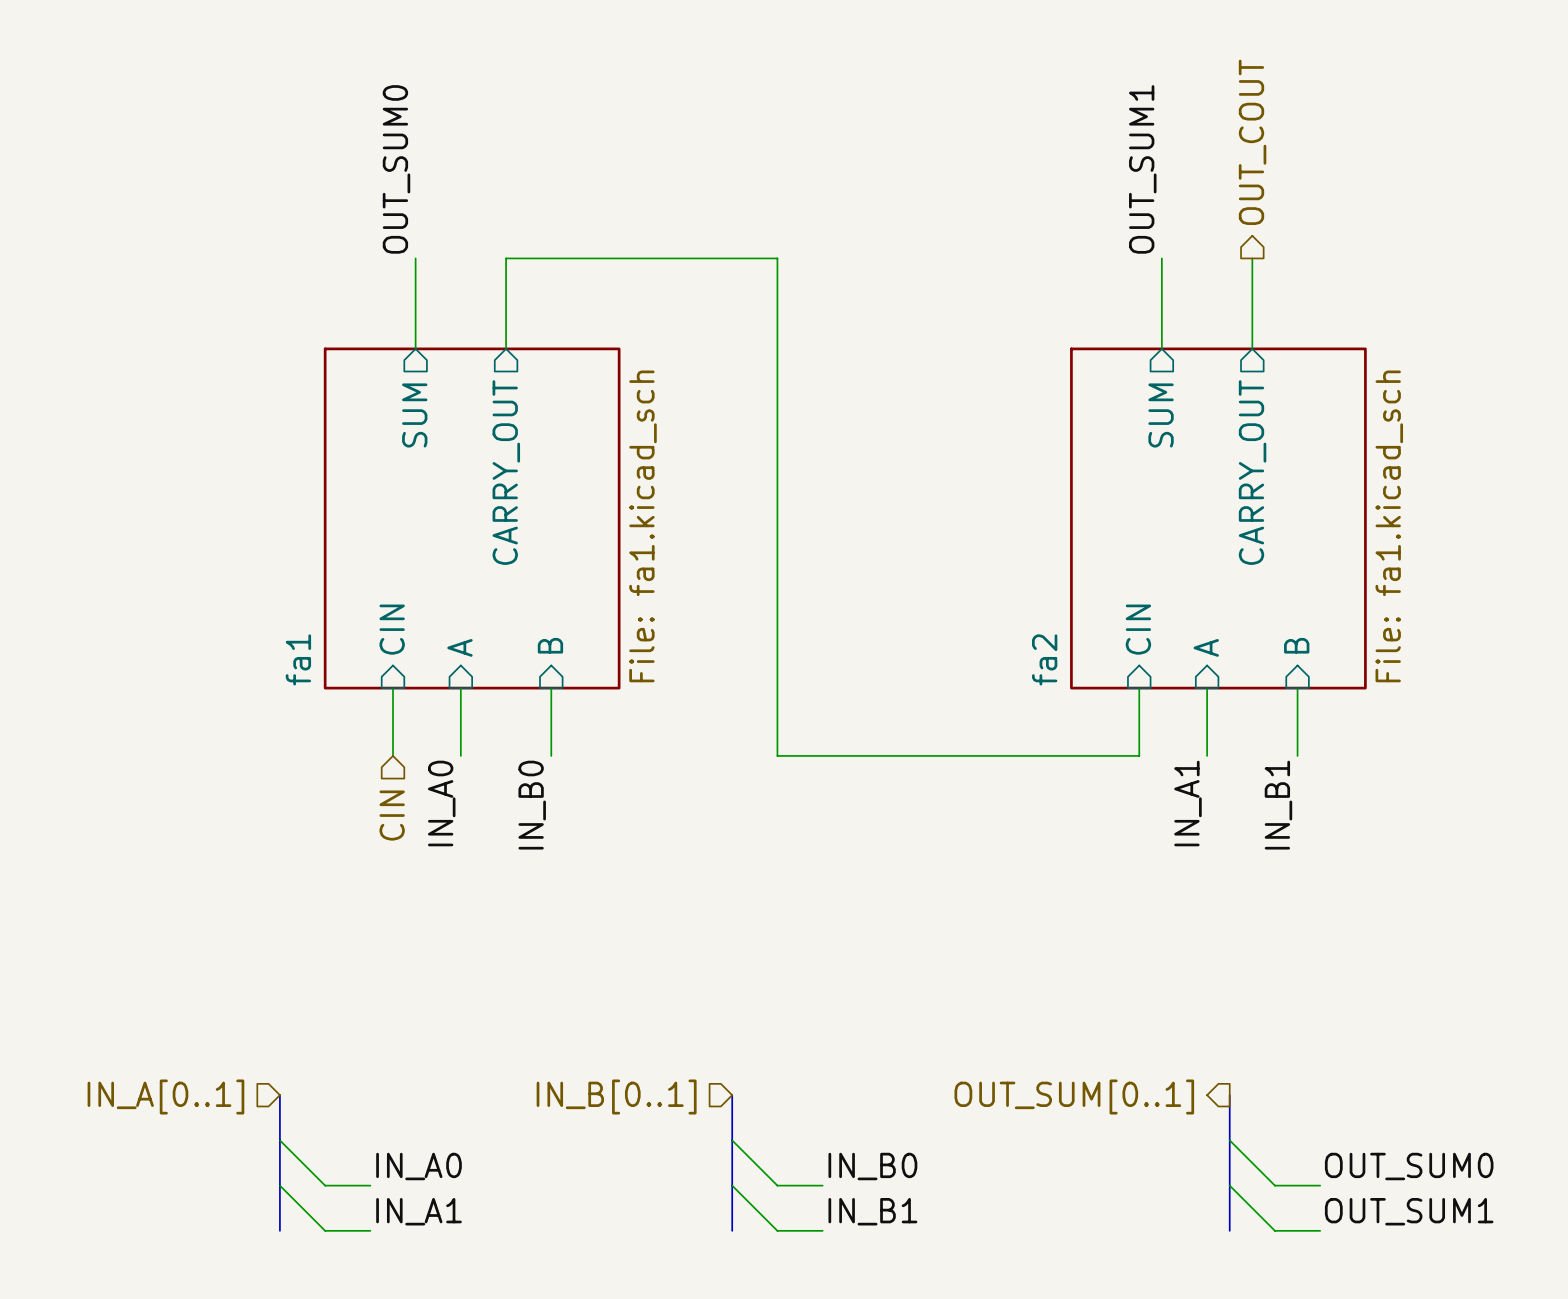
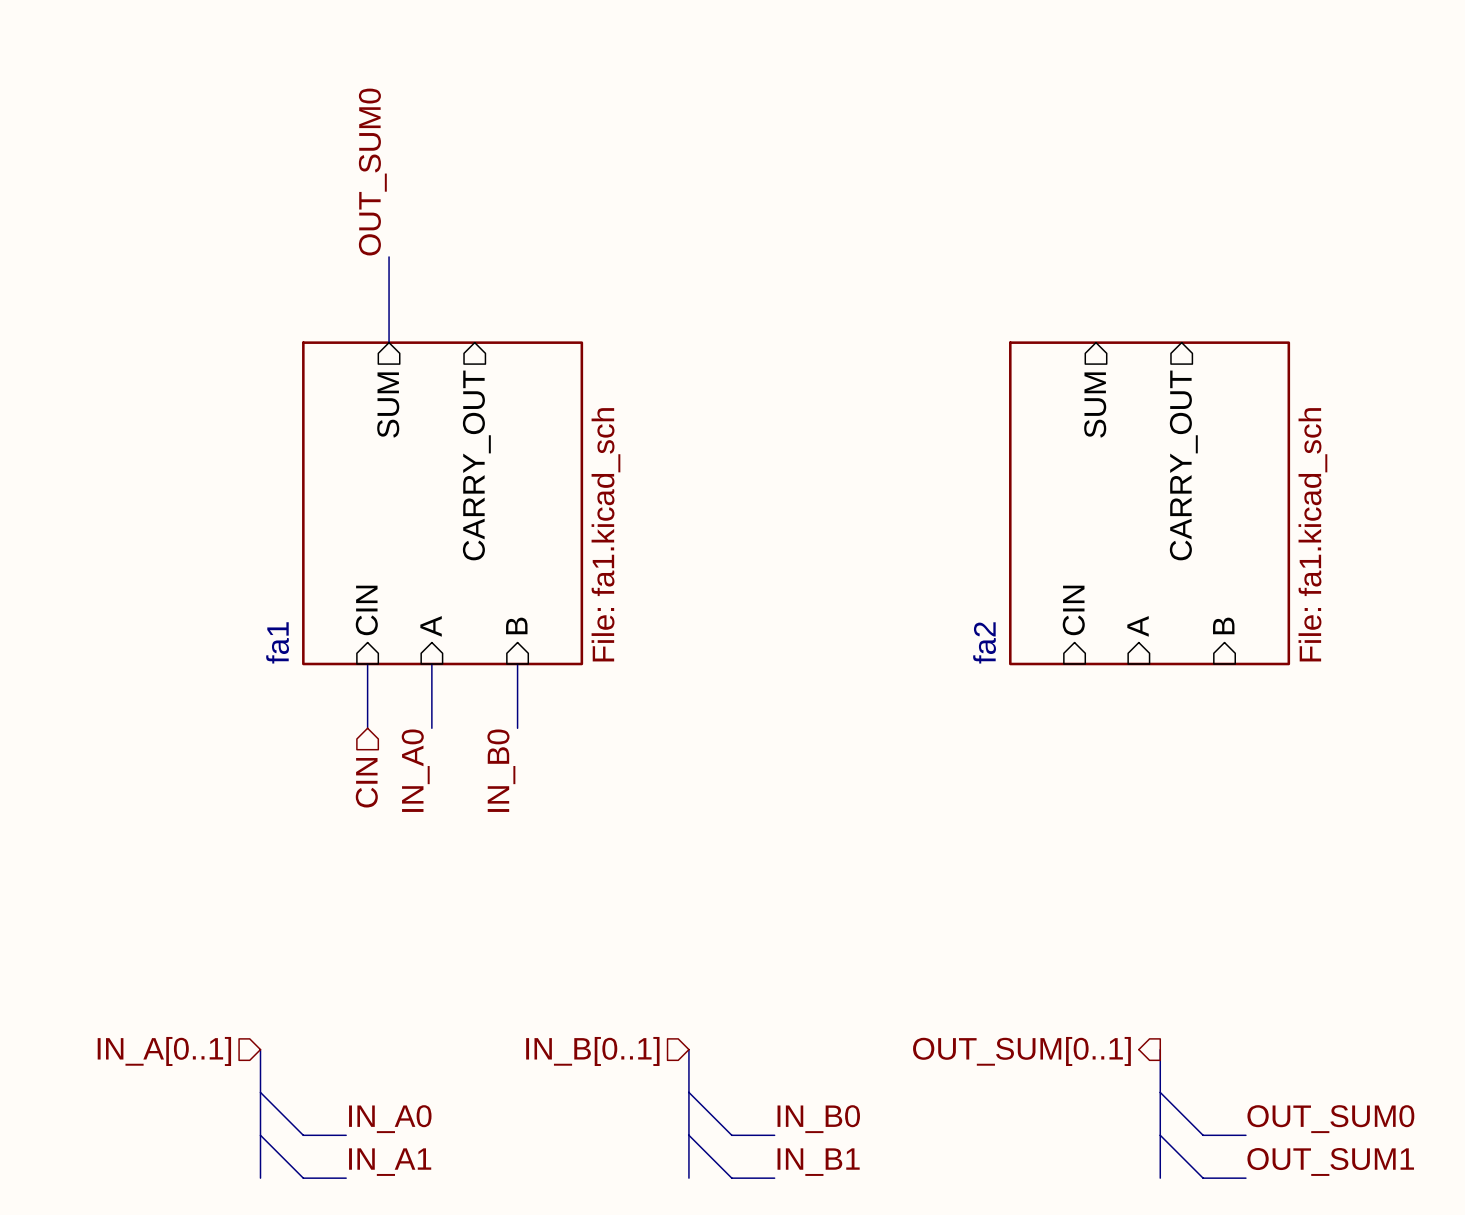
hierarchical label: OUT_COUT (1252, 142) -> none
label: OUT_SUM1 (1142, 169) -> none
wire: (1161, 258) (1161, 348) -> none
wire: (1252, 258) (1252, 348) -> none
wire: (506, 348) (506, 258) (777, 258) (777, 755) (1139, 755) (1139, 688) -> none
wire: (1207, 688) (1207, 755) -> none
wire: (1297, 688) (1297, 755) -> none
label: IN_A1 (1188, 803) -> none
label: IN_B1 (1278, 805) -> none

